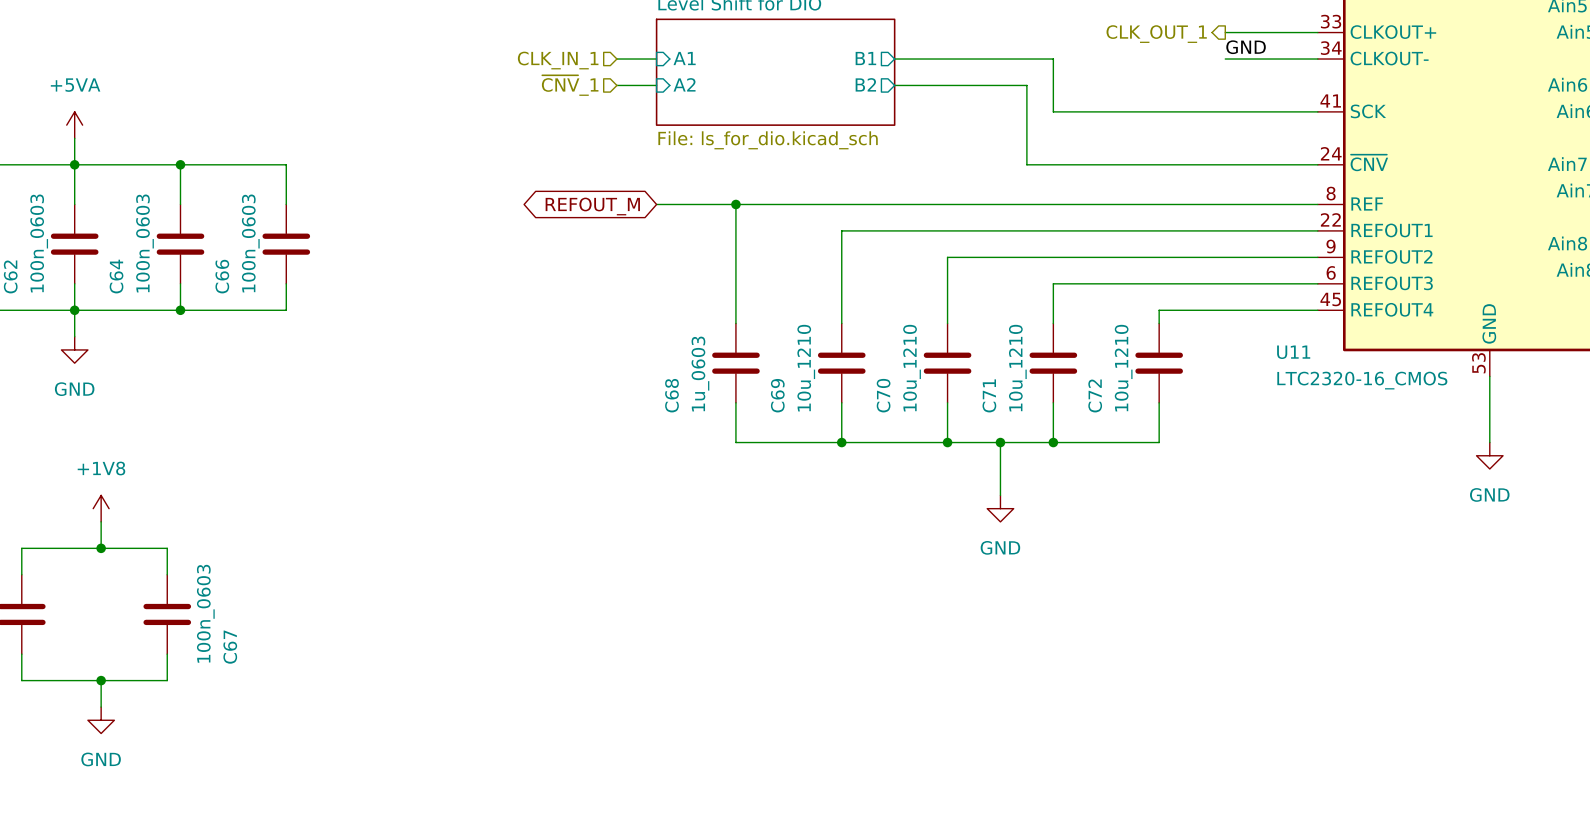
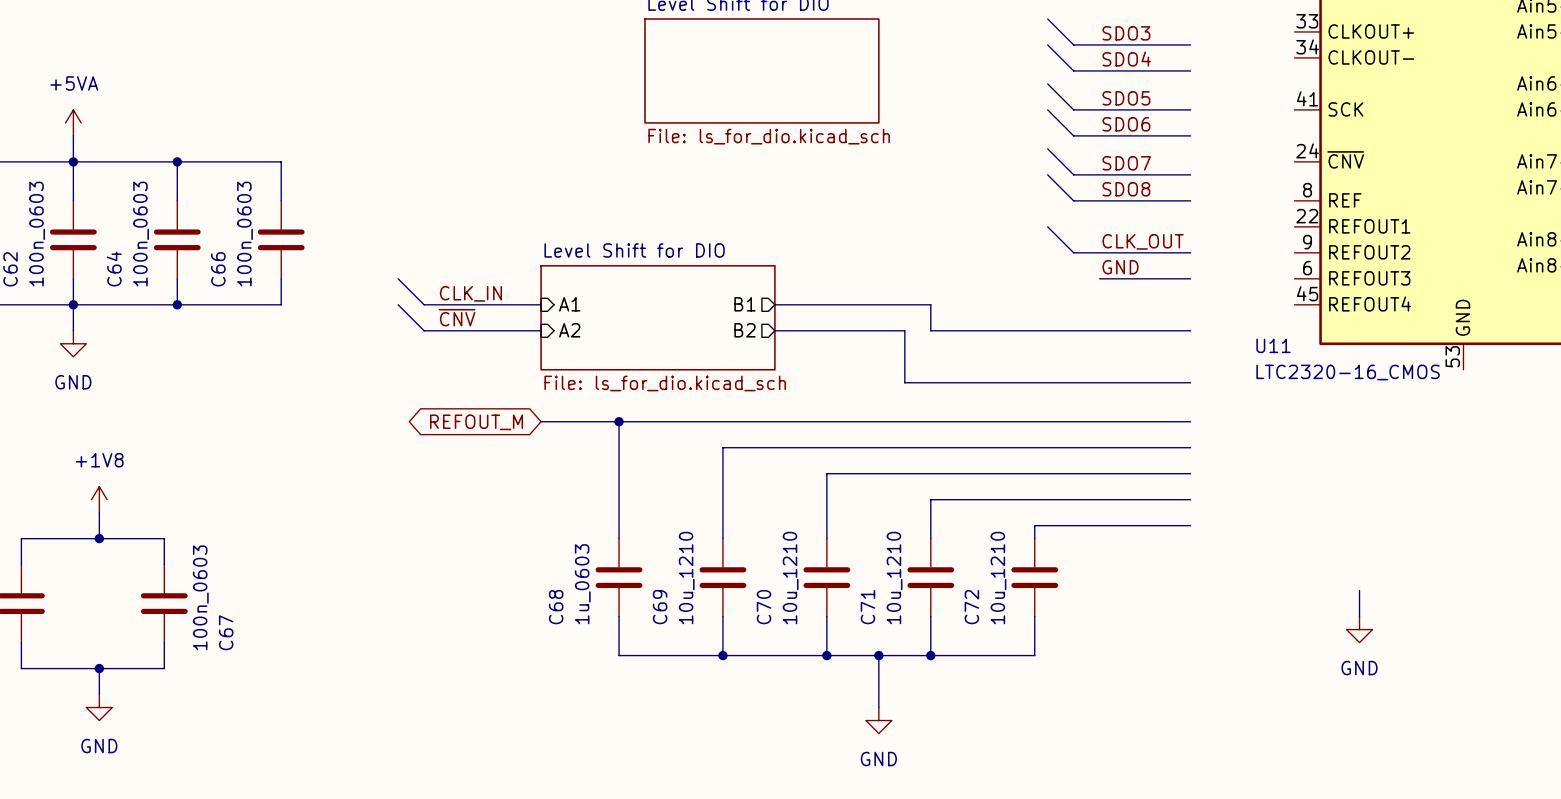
wire: none -> (1047, 18) (1073, 44) (1190, 44)
wire: (1225, 32) (1317, 32) -> none
label: none -> SDO3 (1126, 33)
hierarchical label: CLK_OUT_1 (1156, 34) -> none
wire: none -> (1047, 44) (1073, 70) (1190, 70)
label: GND (1246, 47) -> none
sheet pin: A1 (684, 58) -> none
sheet pin: B1 (865, 58) -> none
wire: (616, 59) (656, 59) -> none
wire: (894, 59) (1053, 59) (1053, 111) (1093, 111) -> (1047, 83) (1073, 109)
wire: (1225, 59) (1317, 59) -> none
hierarchical label: CLK_IN_1 (558, 60) -> none
label: none -> SDO4 (1126, 59)
sheet pin: A2 (684, 84) -> none
sheet pin: B2 (865, 84) -> none
hierarchical label: ~{CNV}_1 (570, 85) -> none
wire: (616, 85) (656, 85) -> none
wire: (894, 85) (1026, 85) (1026, 164) (1317, 164) -> none
label: none -> SDO5 (1126, 98)
wire: none -> (1047, 109) (1073, 135) (1190, 135)
wire: (1212, 111) (1317, 111) -> none
label: none -> SDO6 (1126, 124)
wire: none -> (1047, 148) (1073, 174) (1190, 174)
label: none -> SDO7 (1126, 163)
label: none -> SDO8 (1126, 189)
wire: (656, 204) (1093, 204) -> (1047, 174) (1073, 200)
wire: (735, 204) (735, 323) -> (619, 421) (619, 538)
junction: (735, 204) -> none
wire: (1212, 204) (1317, 204) -> none
global label position: REFOUT_M (592, 206) -> REFOUT_M (476, 422)
wire: (1317, 230) (841, 230) (841, 323) -> (1190, 447) (722, 447) (722, 538)
label: none -> CLK_OUT (1143, 241)
wire: (1093, 257) (947, 257) (947, 310) -> (1073, 252) (1047, 226)
wire: (1212, 257) (1317, 257) -> none
label: none -> GND (1120, 267)
wire: none -> (398, 278) (424, 304) (541, 304)
wire: (1119, 283) (1053, 283) (1053, 323) -> none
wire: (1212, 283) (1317, 283) -> none
label: none -> CLK_IN (470, 293)
sheet pin: none -> A1 (569, 304)
sheet pin: none -> B1 (745, 304)
wire: none -> (398, 304) (424, 330) (541, 330)
wire: none -> (774, 304) (930, 304)
wire: (1317, 310) (1159, 310) (1159, 323) -> (1190, 525) (1034, 525) (1034, 538)
label: none -> ~{CNV} (457, 317)
sheet Level Shift for DIO: none -> File: ls_for_dio.kicad_sch (657, 317)
wire: none -> (930, 317) (930, 330) (1190, 330)
sheet pin: none -> A2 (569, 330)
sheet pin: none -> B2 (745, 330)
wire: none -> (774, 330) (904, 330) (904, 382) (1190, 382)
C68 position: (735, 363) -> (619, 577)
C69 position: (841, 363) -> (722, 577)
C70 position: (947, 363) -> (826, 577)
C71 position: (1053, 363) -> (930, 577)
C72 position: (1159, 363) -> (1034, 577)
wire: (1489, 376) (1489, 442) -> none
wire: (735, 402) (735, 442) (1159, 442) (1159, 402) -> (619, 616) (619, 655) (1034, 655) (1034, 616)
wire: (841, 402) (841, 442) -> (722, 616) (722, 655)
wire: (947, 402) (947, 442) -> (826, 616) (826, 655)
wire: (1053, 402) (1053, 442) -> (930, 616) (930, 655)
wire: none -> (541, 421) (1190, 421)
junction: none -> (619, 421)
junction: (841, 442) -> none
junction: (947, 442) -> none
wire: (1000, 442) (1000, 495) -> (878, 655) (878, 707)
junction: (1000, 442) -> none
junction: (1053, 442) -> none
power symbol: GND (1489, 455) -> none
wire: none -> (1190, 473) (826, 473) (826, 538)
power symbol: GND (1000, 508) -> none
wire: none -> (1190, 499) (930, 499) (930, 538)
wire: none -> (1359, 590) (1359, 616)
power symbol: none -> GND (1359, 629)
junction: none -> (722, 655)
junction: none -> (826, 655)
junction: none -> (878, 655)
junction: none -> (930, 655)
power symbol: none -> GND (878, 720)

